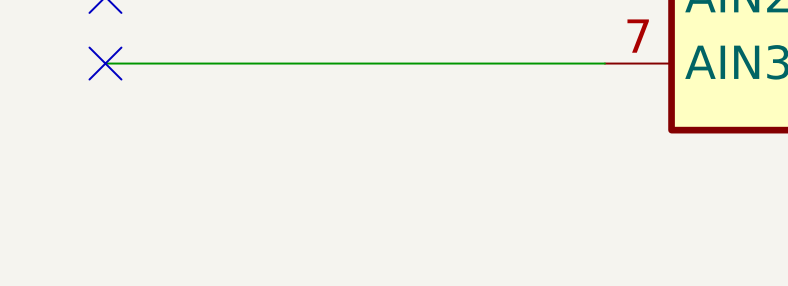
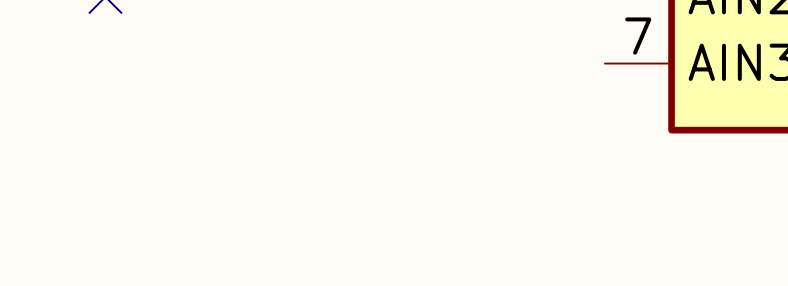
wire: (105, 63) (604, 63) -> none
no-connect mark: (105, 63) -> none

